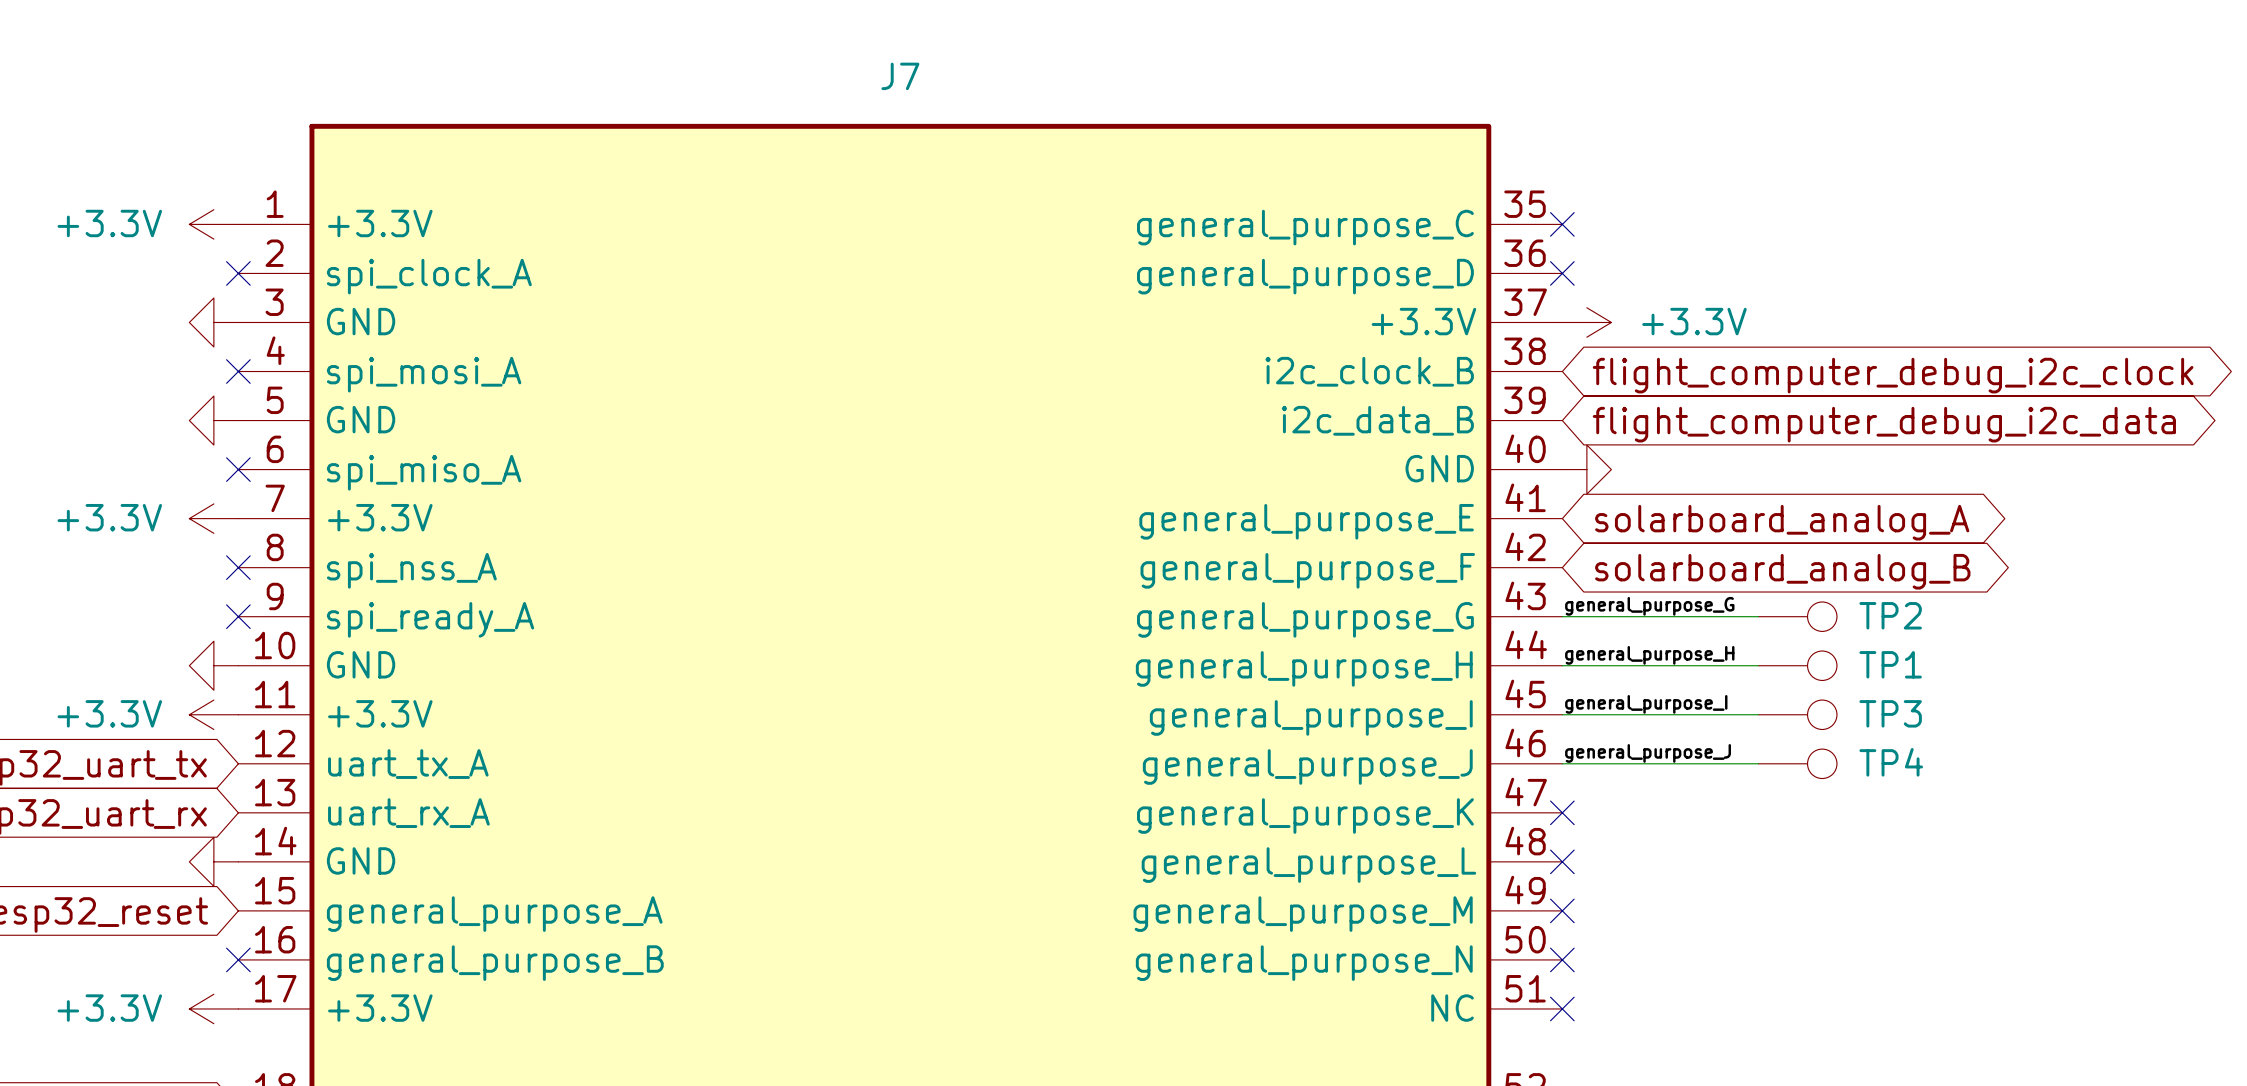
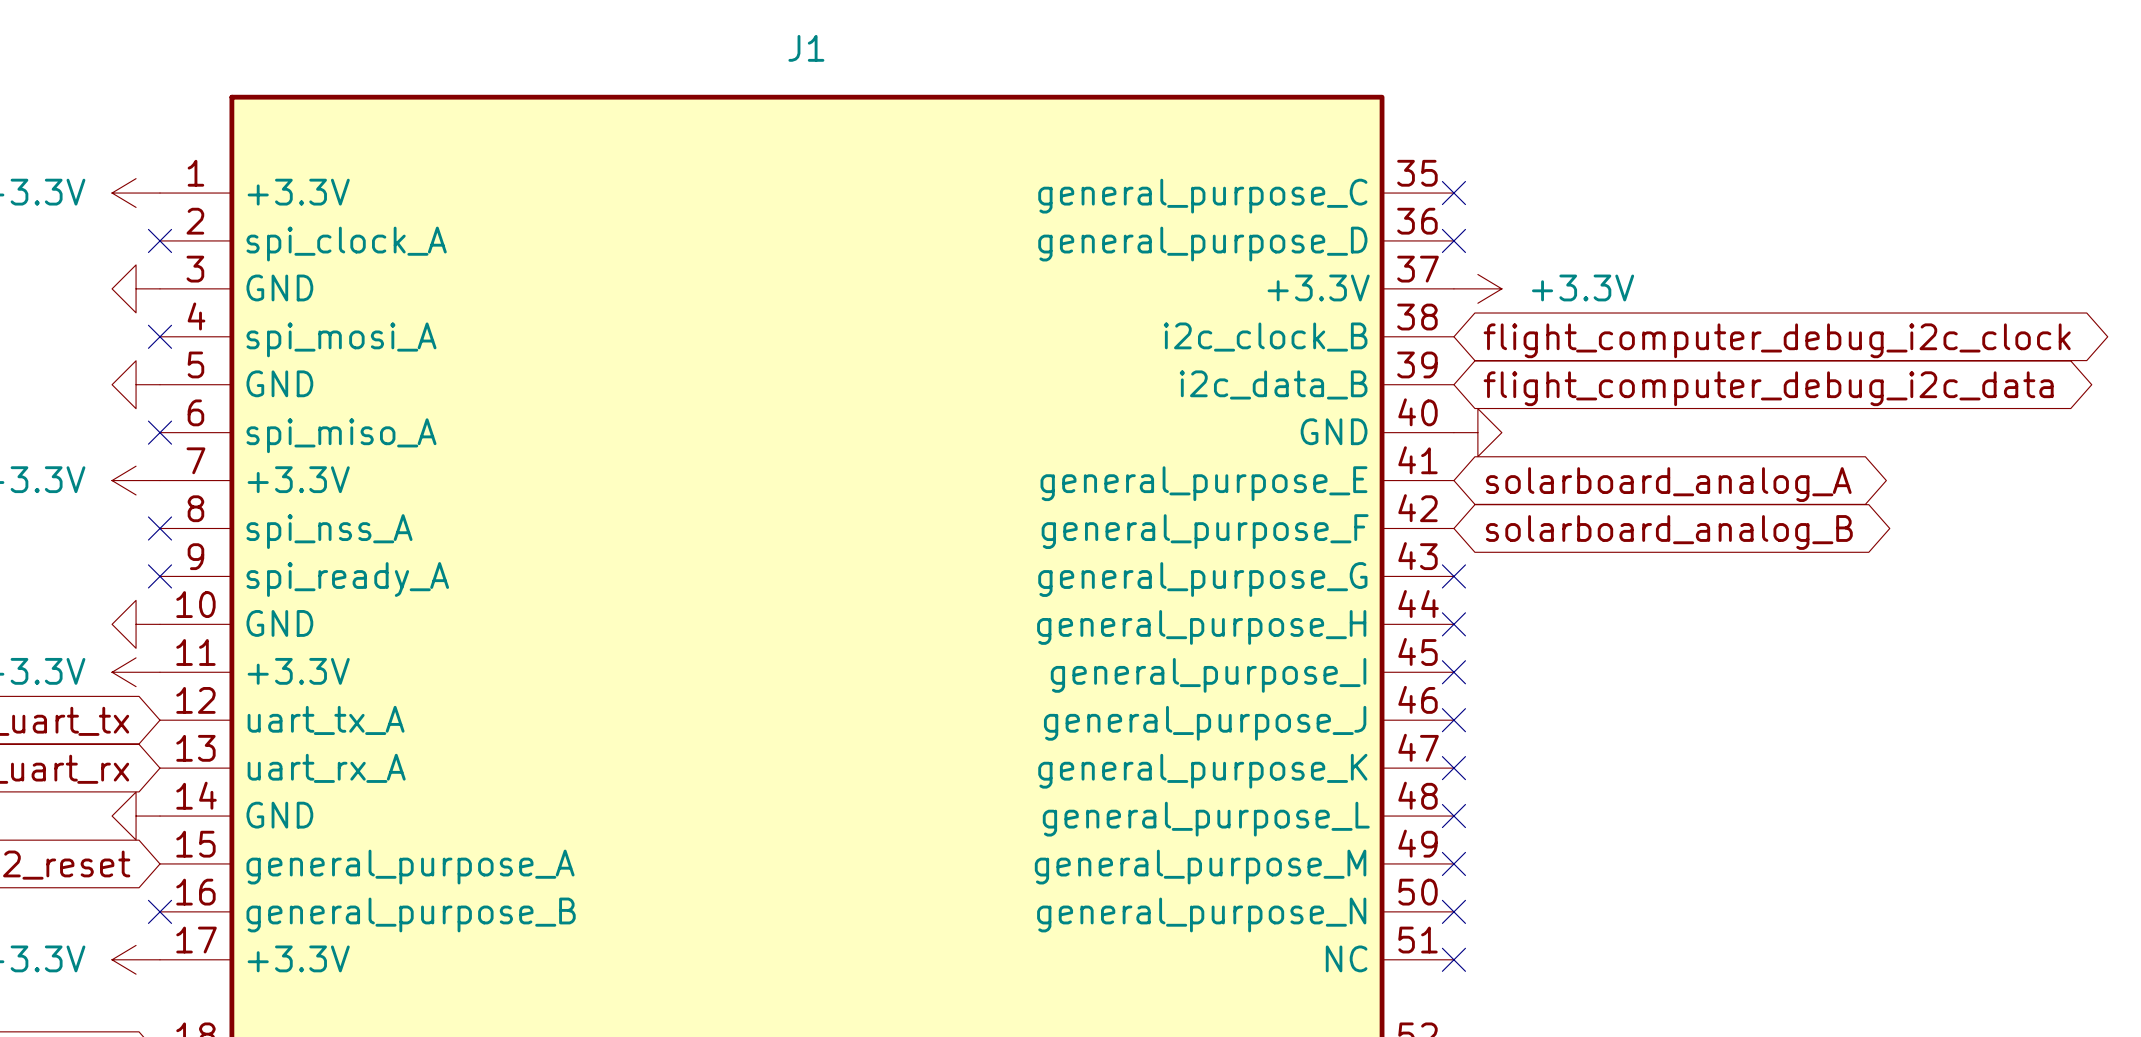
J7 name: J7 (900, 76) -> J1 (806, 48)
label: general_purpose_G (1649, 606) -> none
wire: (1562, 616) (1758, 616) -> none
no-connect mark: none -> (1453, 576)
TP2: (1797, 616) -> none
label: general_purpose_H (1649, 655) -> none
wire: (1562, 665) (1758, 665) -> none
no-connect mark: none -> (1453, 624)
TP1: (1797, 665) -> none
label: general_purpose_I (1646, 704) -> none
wire: (1562, 714) (1758, 714) -> none
no-connect mark: none -> (1453, 672)
TP3: (1797, 714) -> none
label: general_purpose_J (1648, 753) -> none
wire: (1562, 763) (1758, 763) -> none
no-connect mark: none -> (1453, 720)
TP4: (1797, 763) -> none

